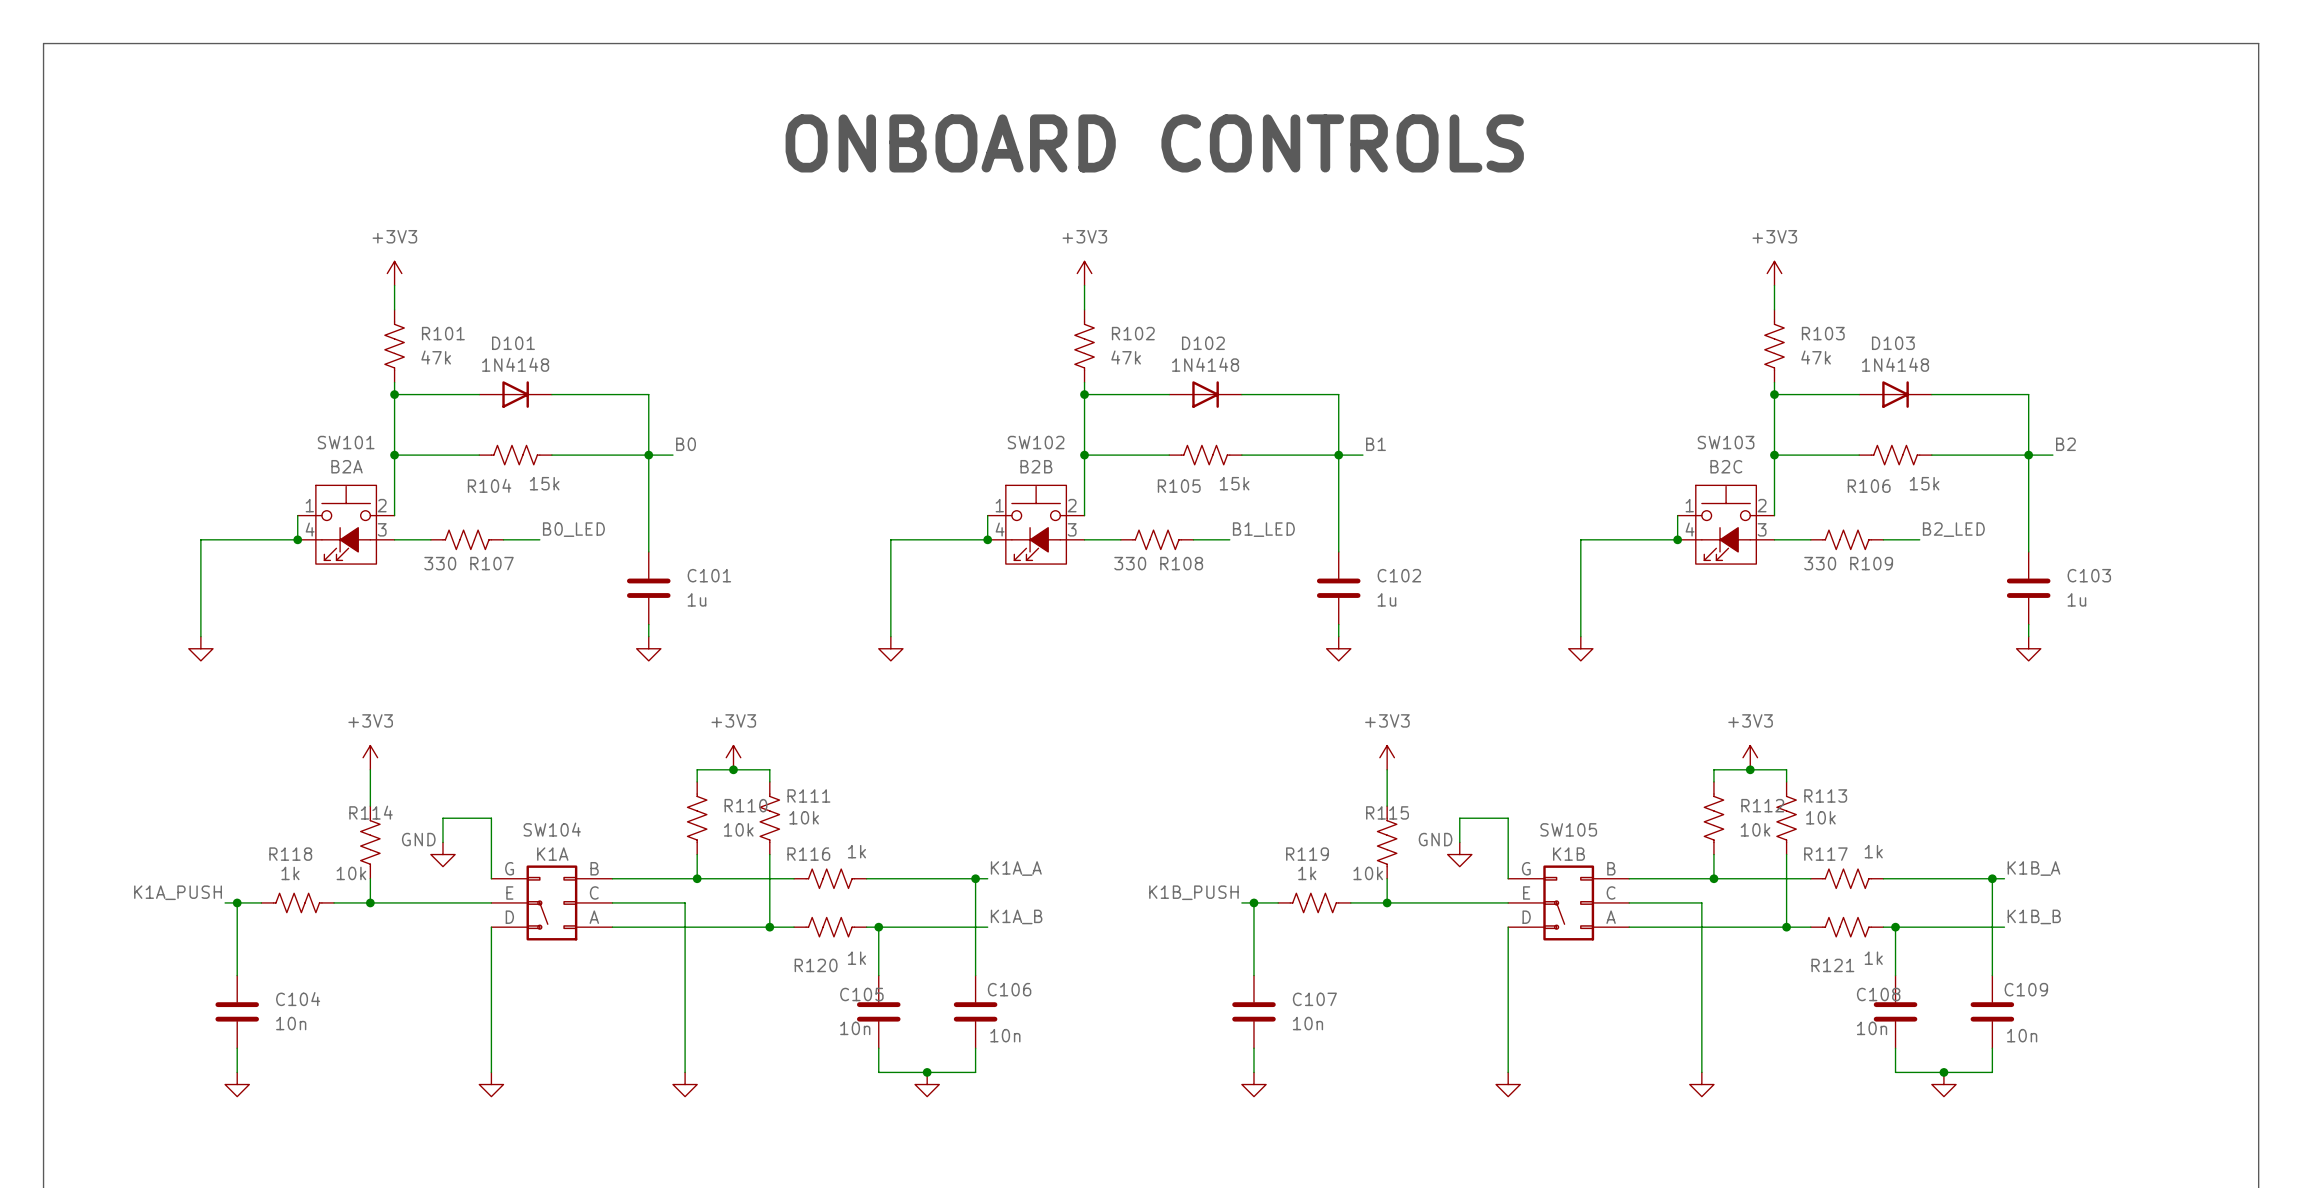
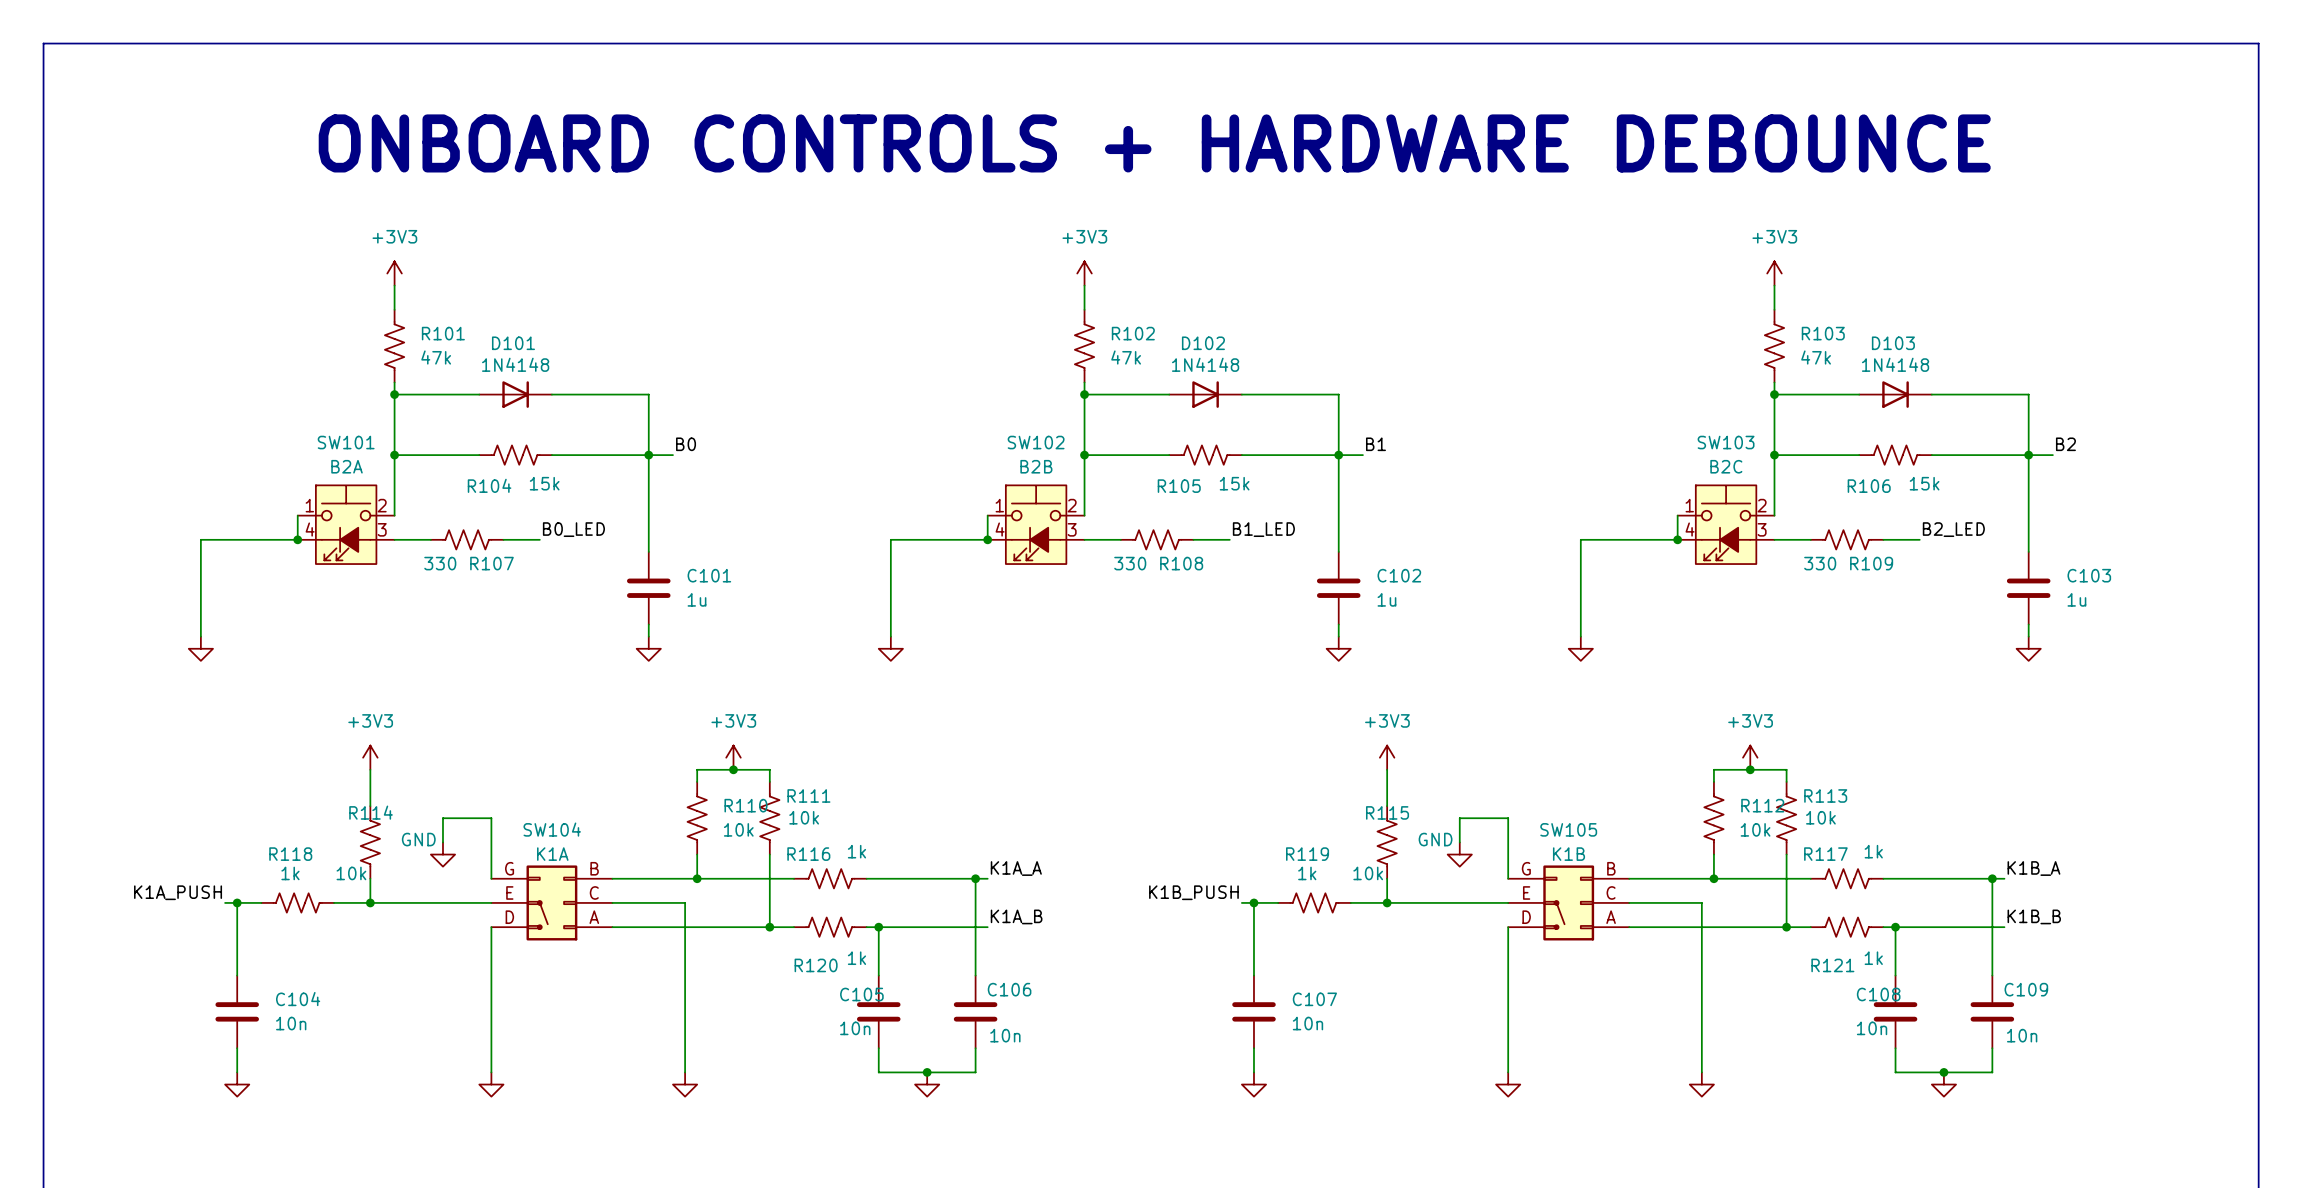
text: ONBOARD CONTROLS (1154, 143) -> ONBOARD CONTROLS + HARDWARE DEBOUNCE (1154, 143)

